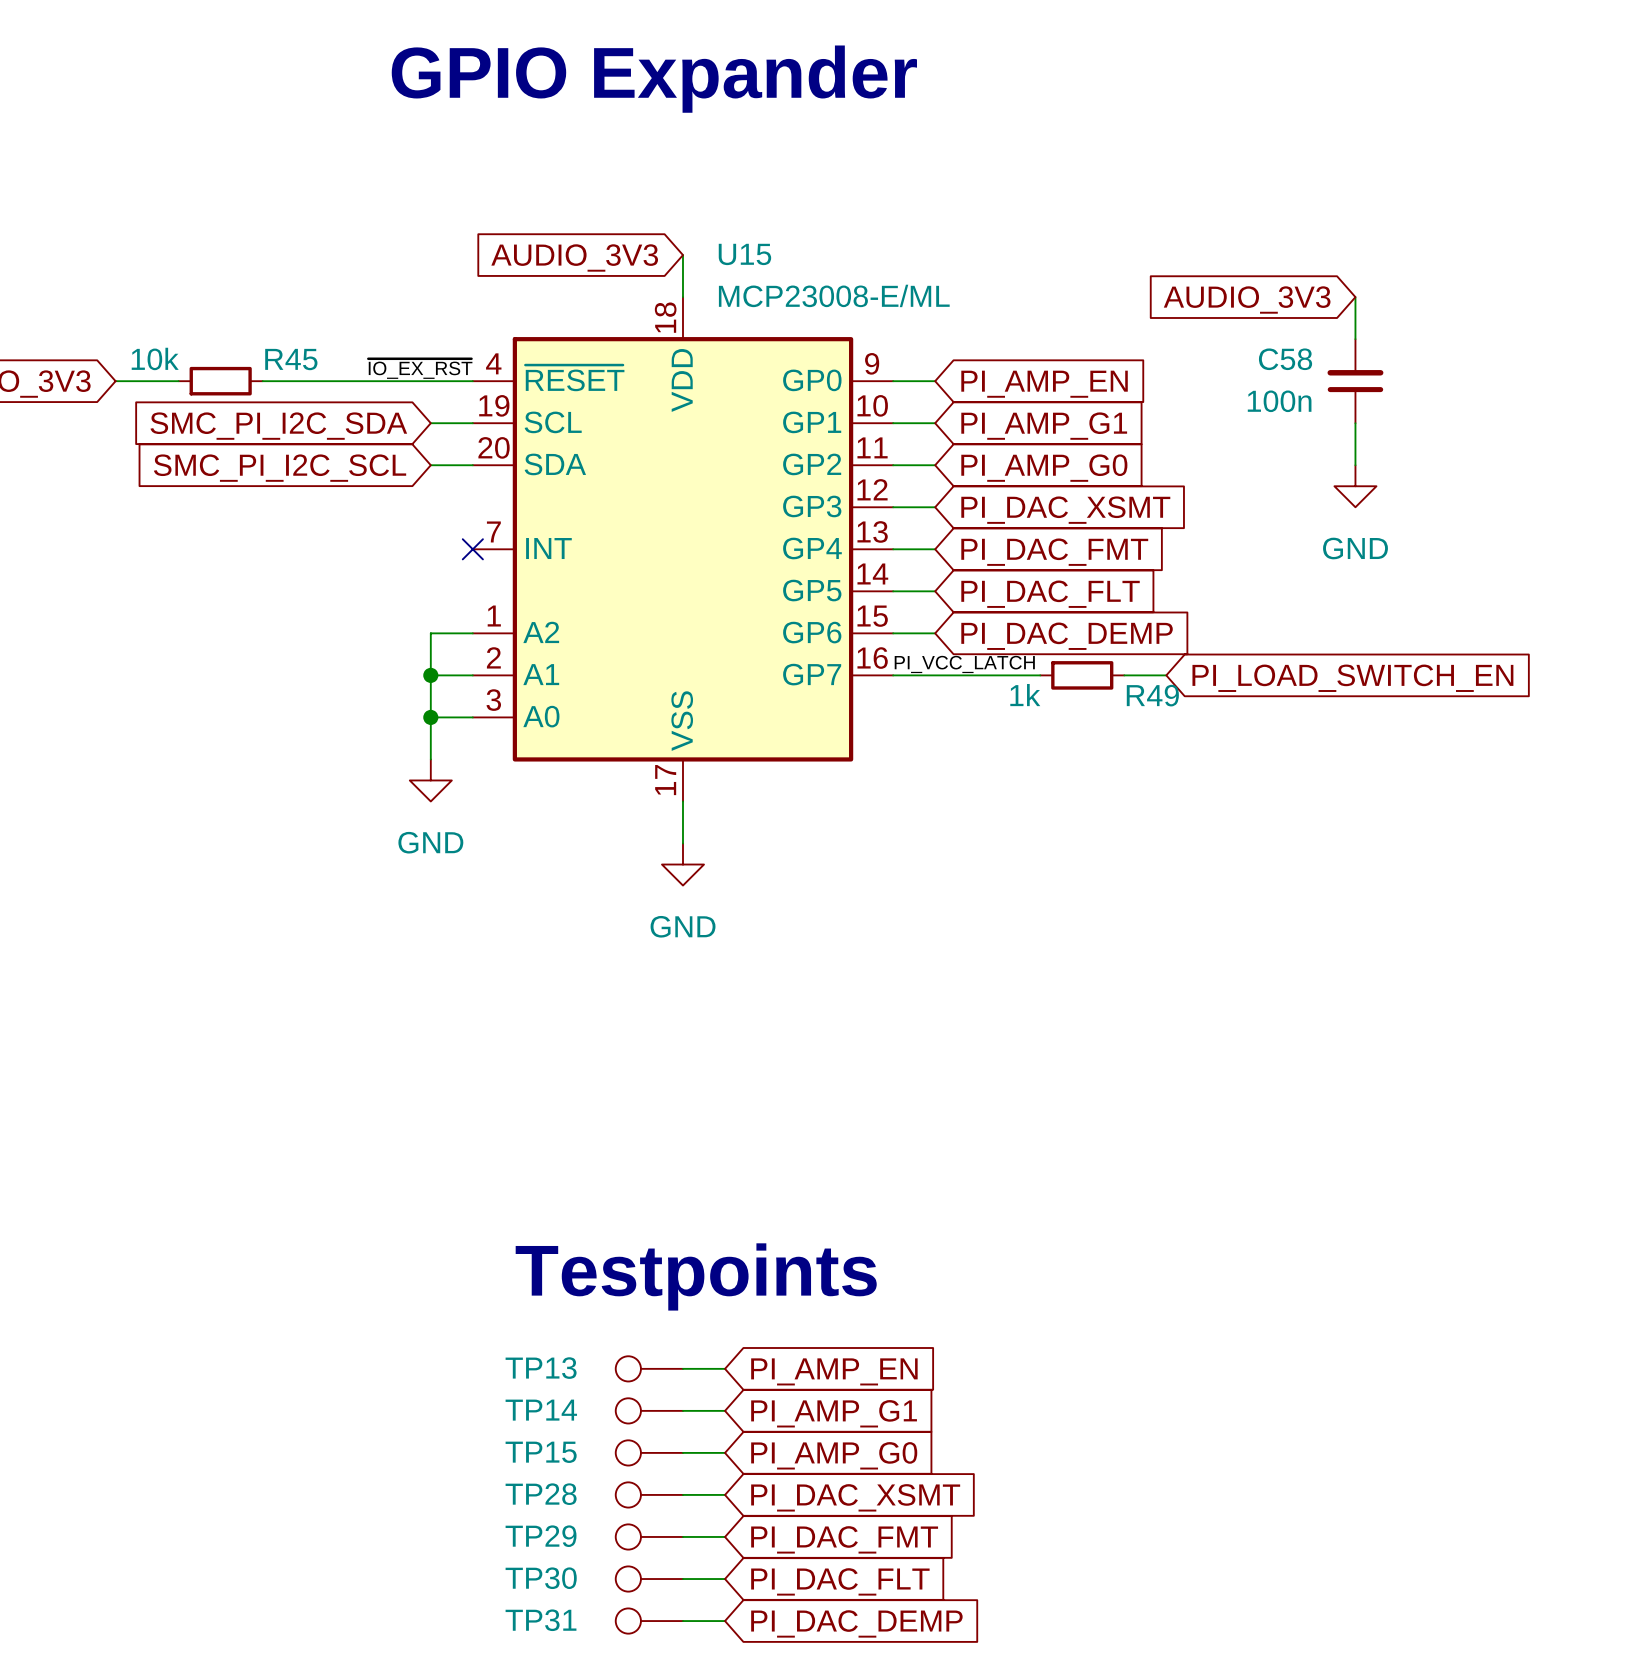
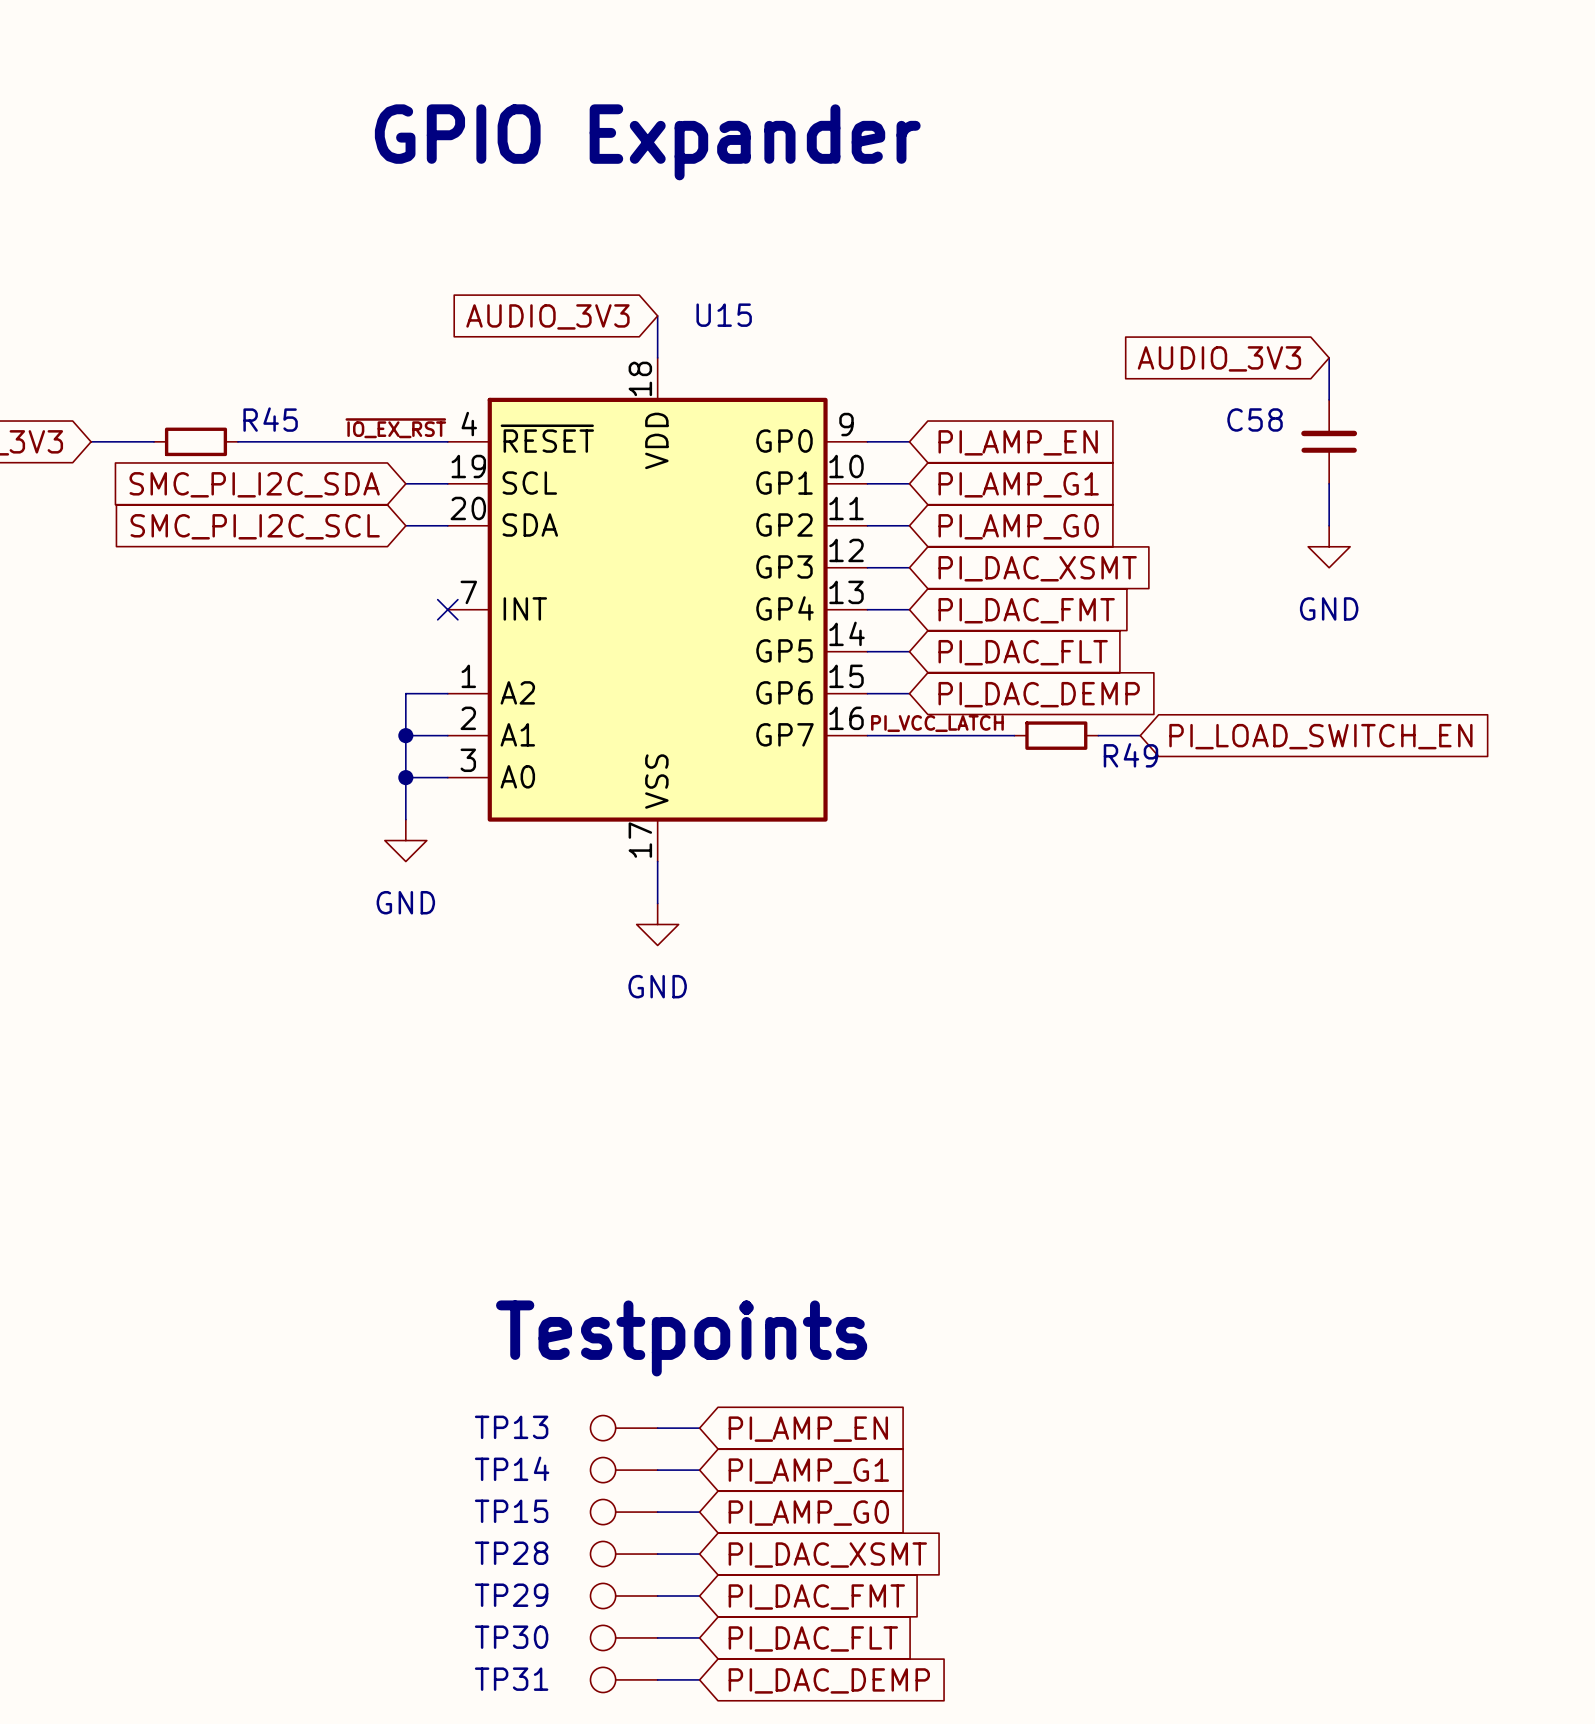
U15 value: MCP23008-E/ML (834, 295) -> none
R45 value: 10k (155, 358) -> none
C58 value: 100n (1279, 401) -> none
R49 value: 1k (1025, 695) -> none

